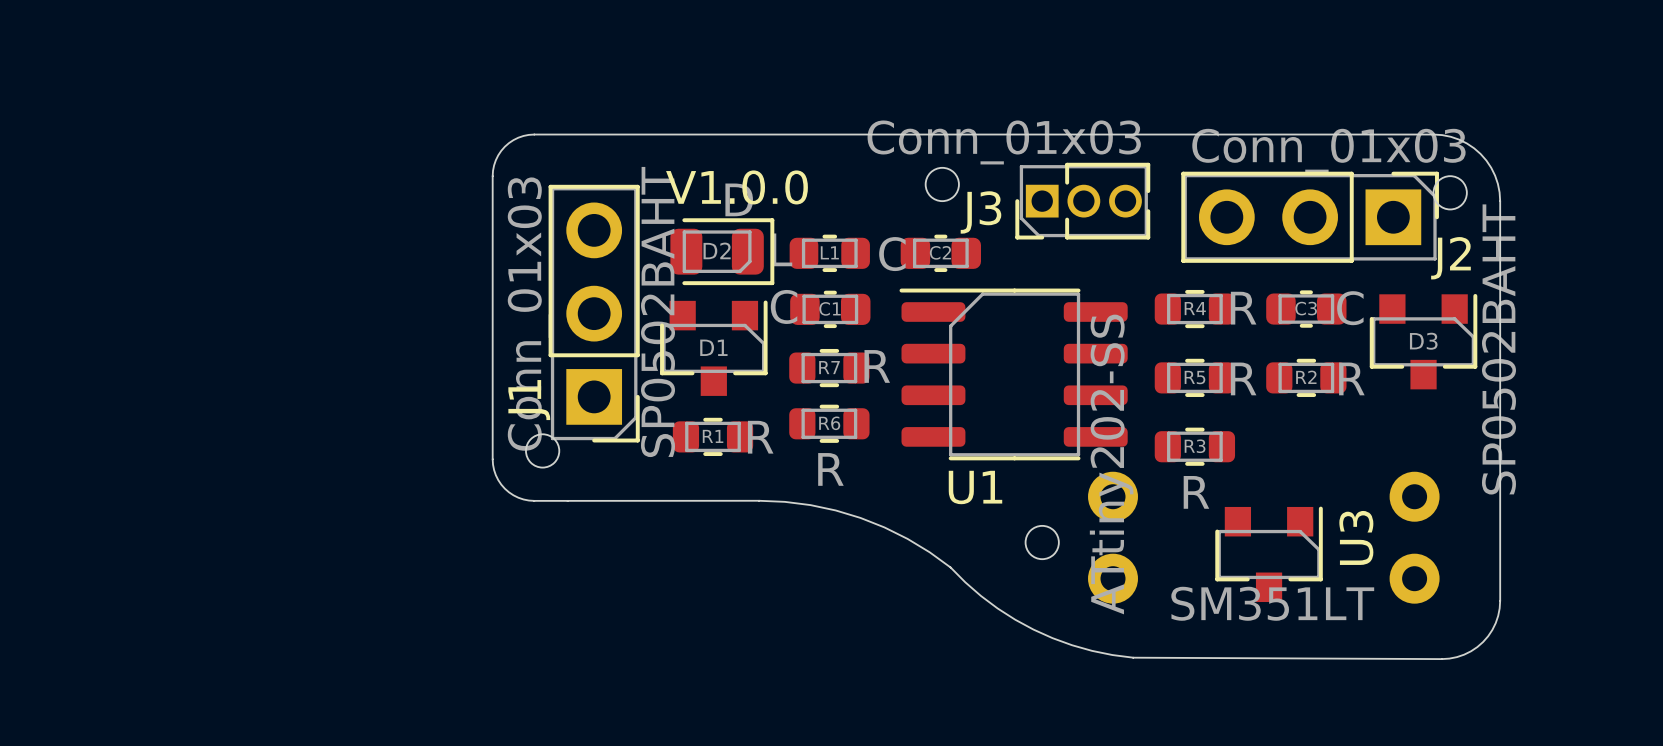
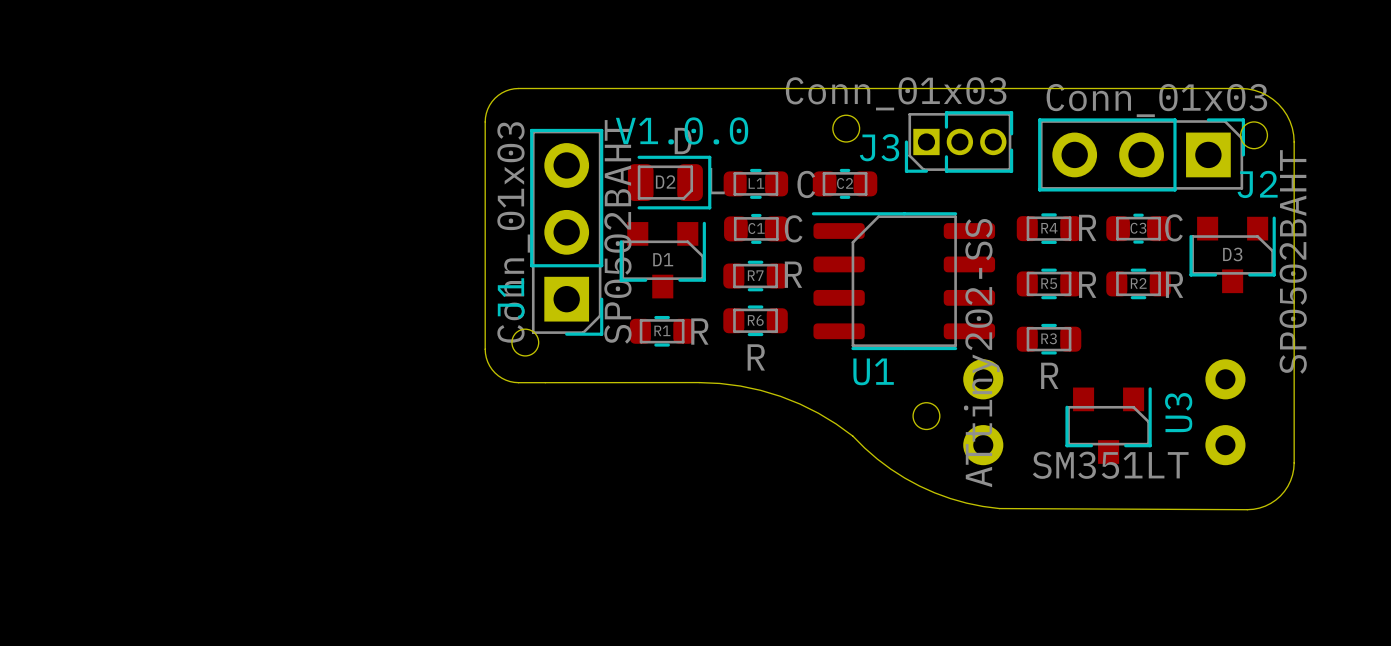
C1 value position: C (784, 306) -> C (793, 228)

